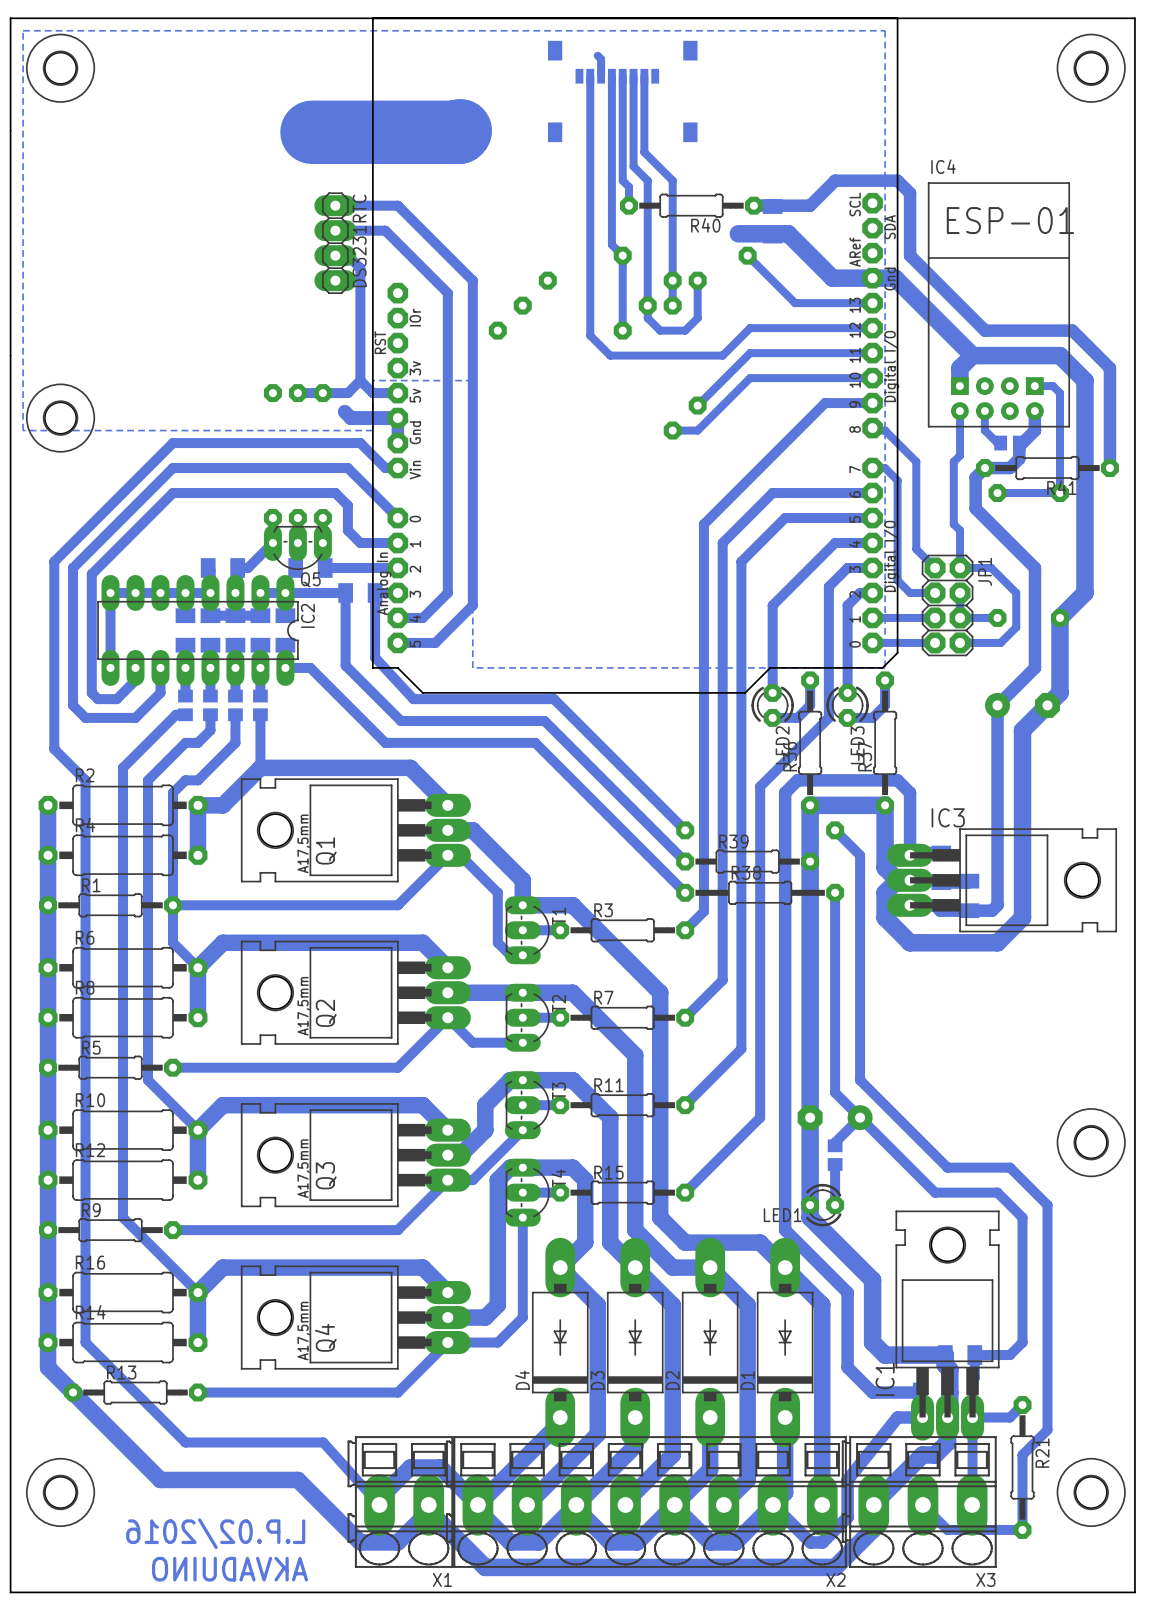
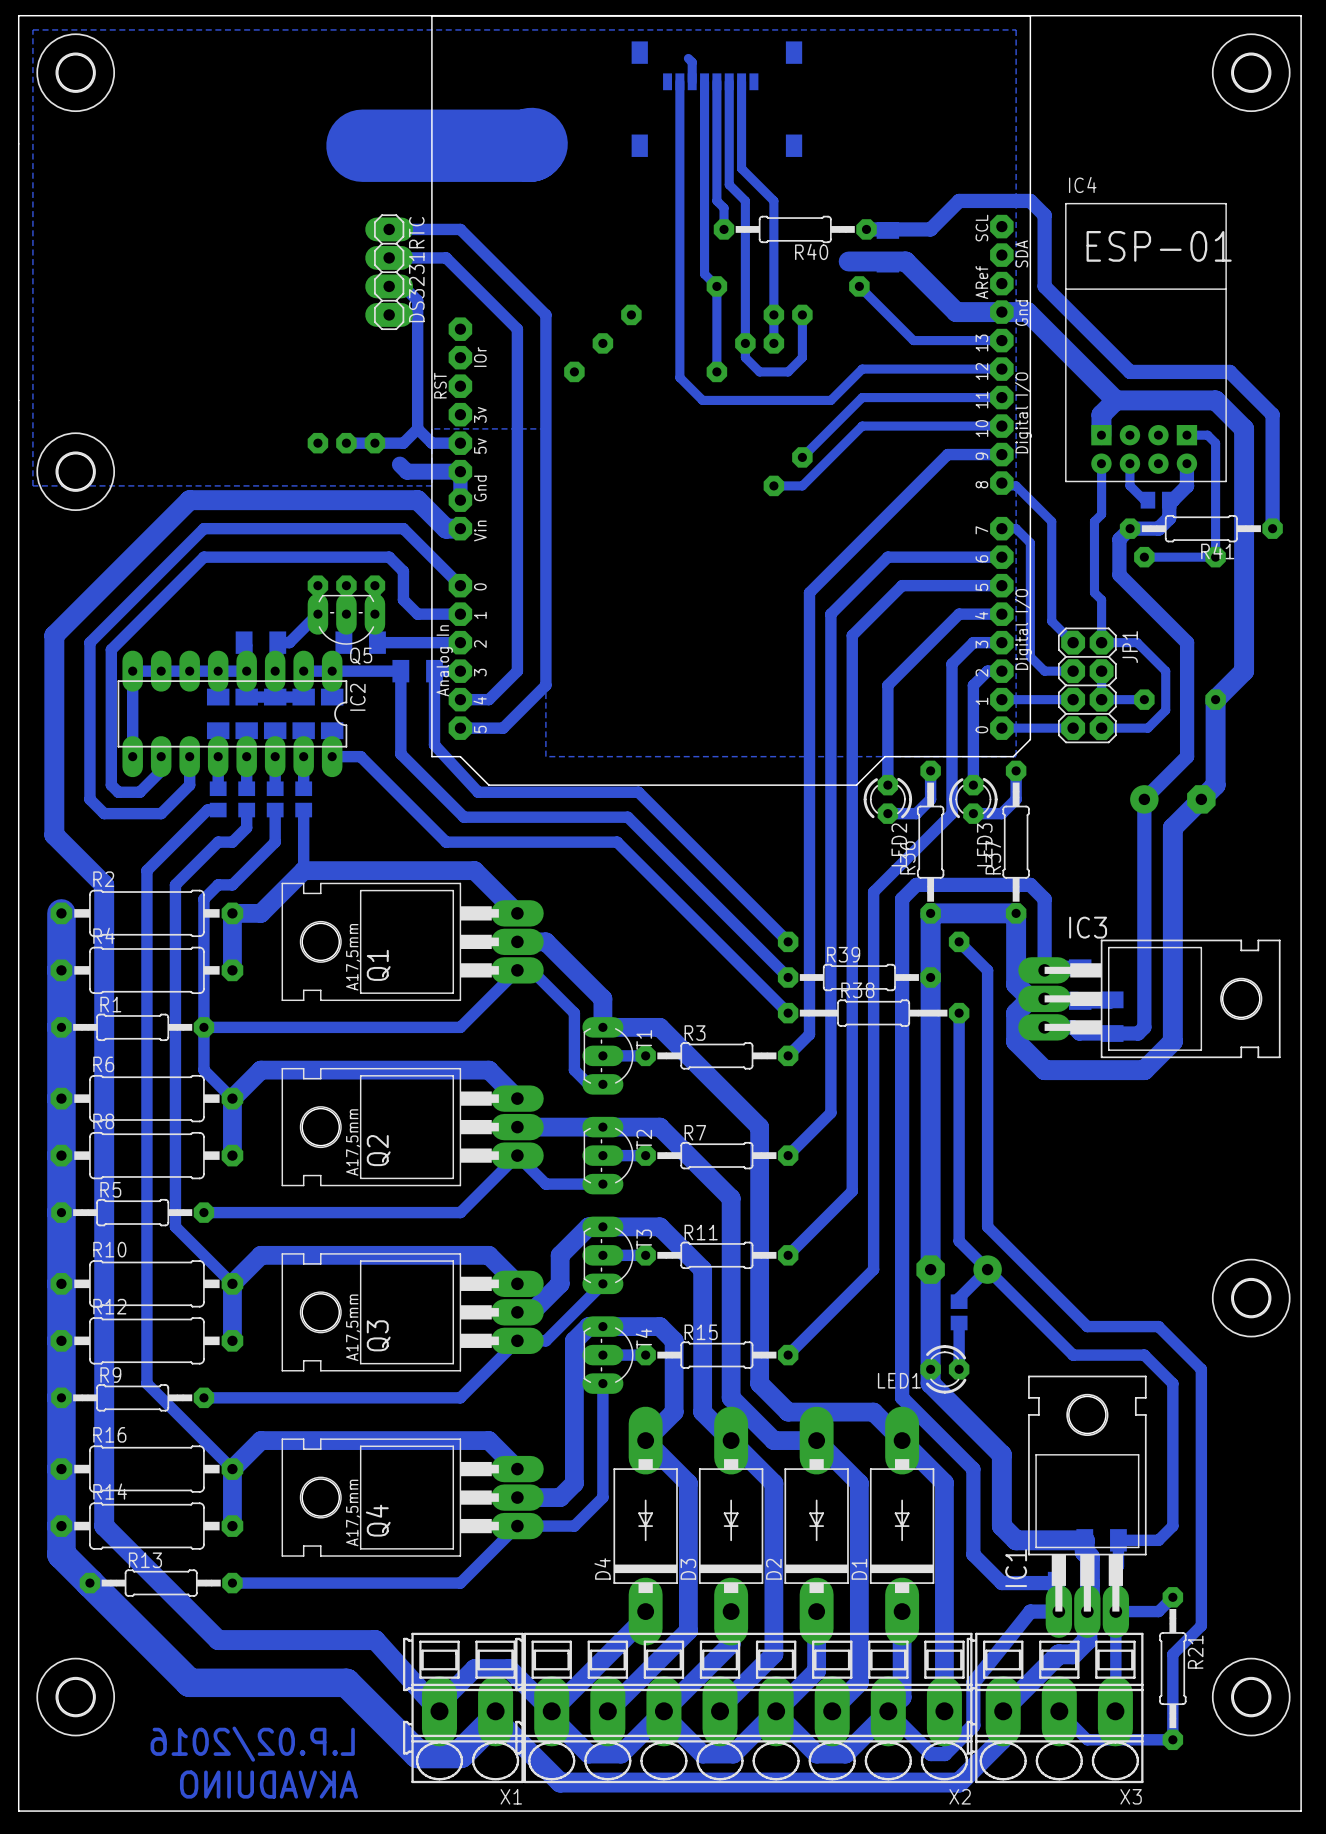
bottom track: (172, 443) (54, 561) (54, 749) -> (203, 500) (189, 500) (54, 635) (54, 835) (68, 849)
bottom track width: thin (172, 443) (360, 443) (385, 468) (397, 468) -> thick (203, 500) (417, 500) (446, 528) (460, 528)
bottom track width: thin (54, 749) (85, 780) (85, 1342) (185, 1442) (323, 1442) (379, 1504) -> thick (68, 849) (104, 884) (104, 1526) (218, 1640) (375, 1640) (439, 1711)
bottom track width: thin (48, 805) (48, 1367) (160, 1479) (297, 1479) (360, 1542) (397, 1542) (428, 1511) -> thick (61, 913) (61, 1554) (189, 1682) (346, 1682) (417, 1754) (460, 1754) (495, 1718)

